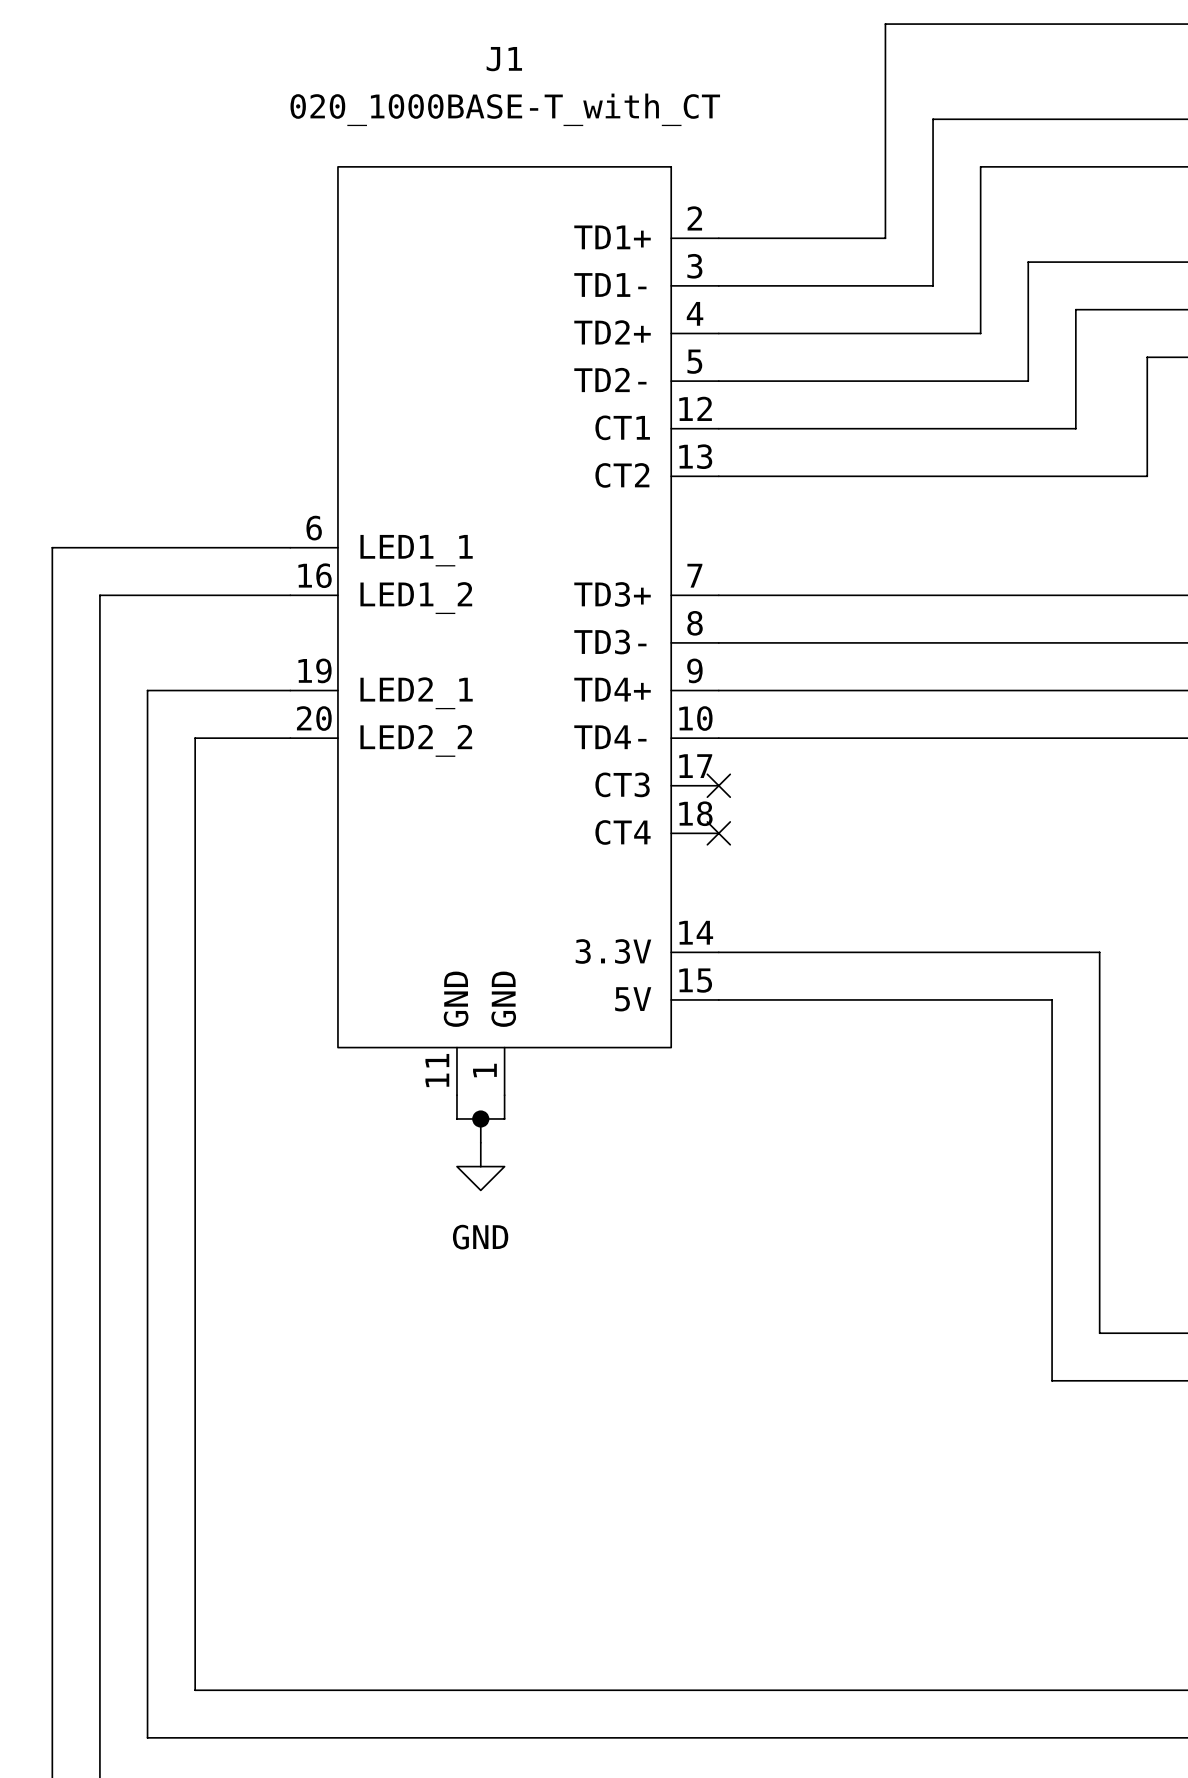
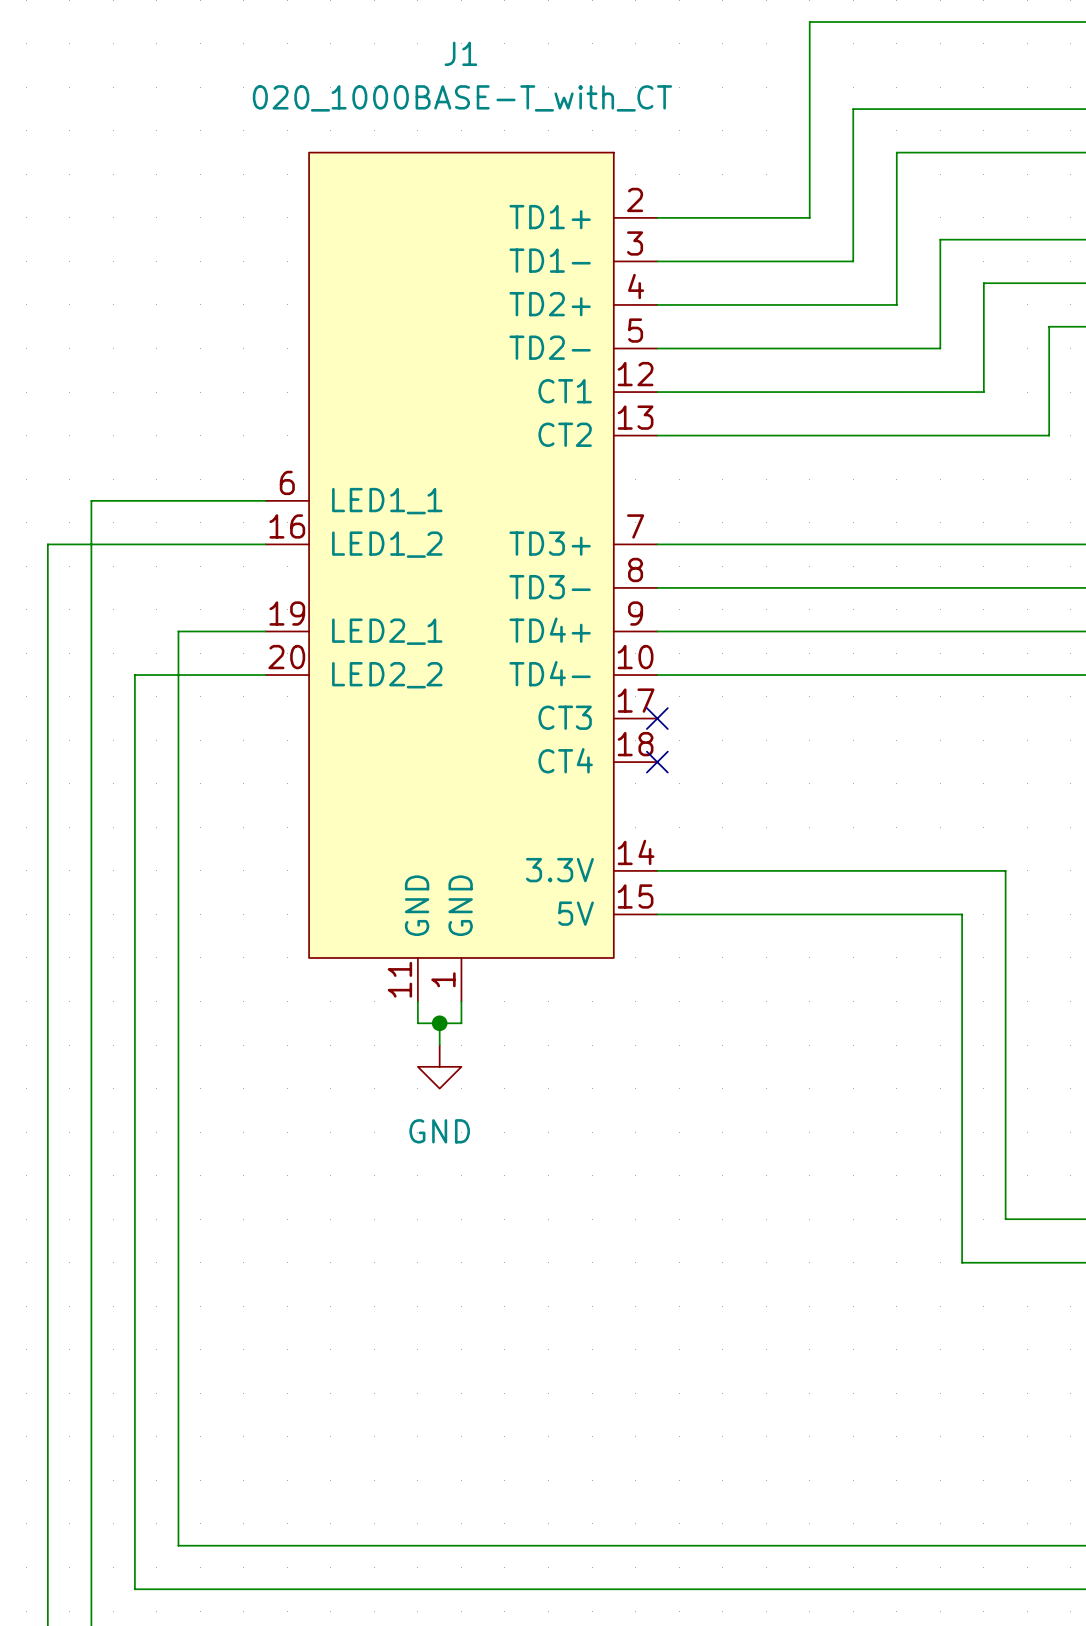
wire: (99, 547) (52, 547) (52, 595) -> (91, 500) (91, 544) (47, 544)
wire: (195, 690) (147, 690) (147, 738) -> (178, 631) (178, 675) (134, 675)

